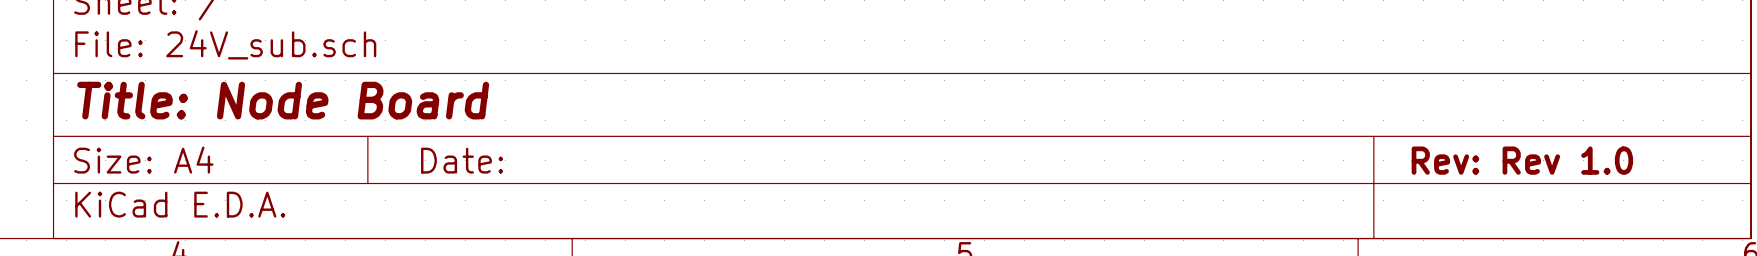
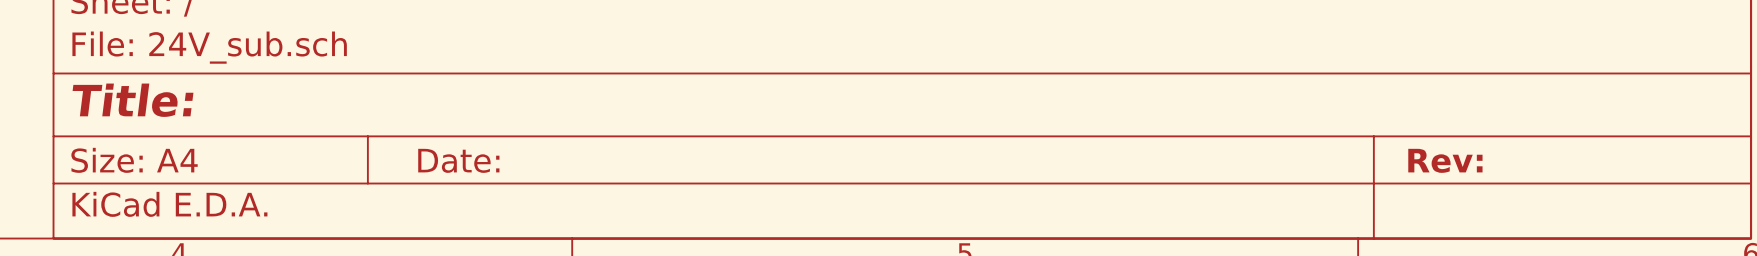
title block: Title: Node Board (283, 100) -> Title: (133, 100)
title block: Rev: Rev 1.0 (1522, 160) -> Rev: (1445, 160)

